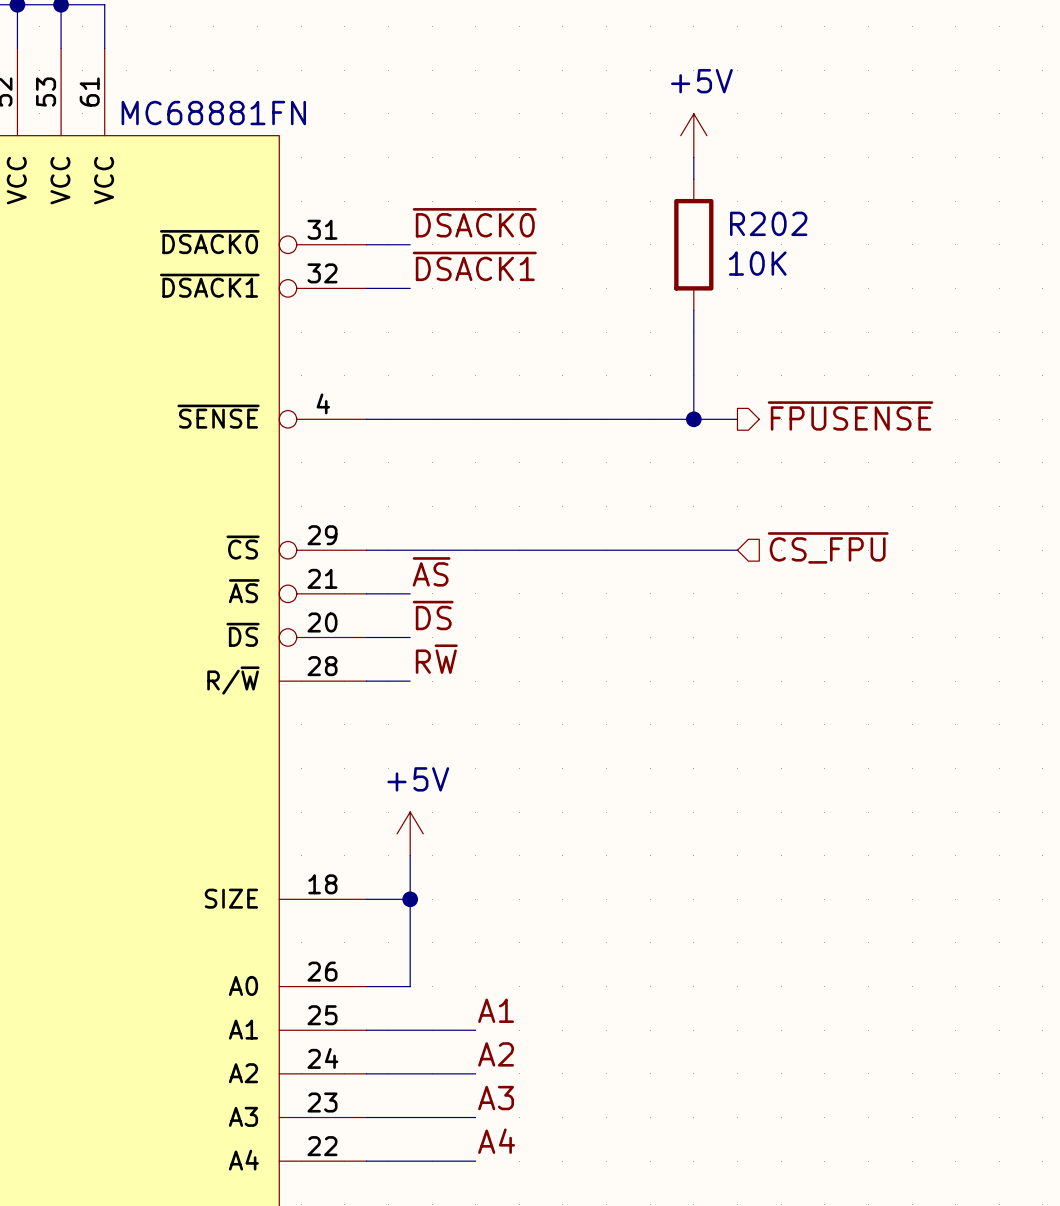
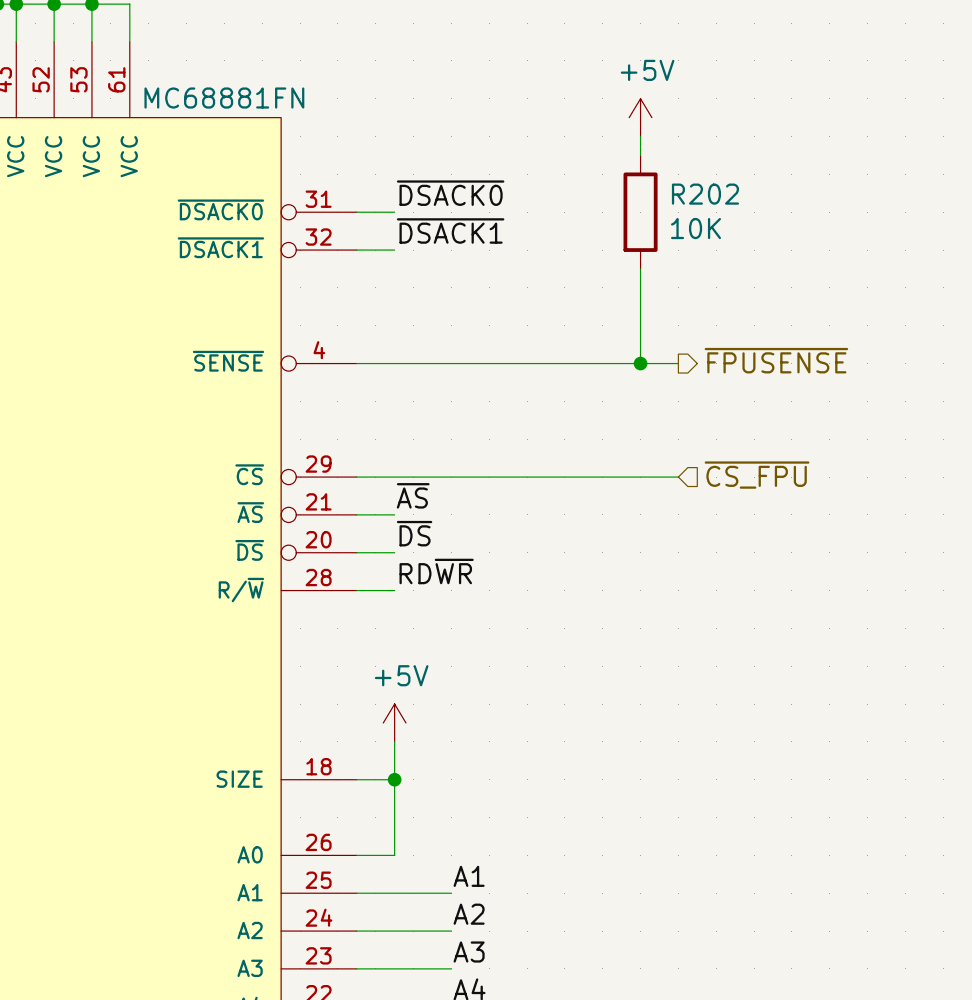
label: R~{W} (436, 659) -> RD~{WR} (436, 571)

